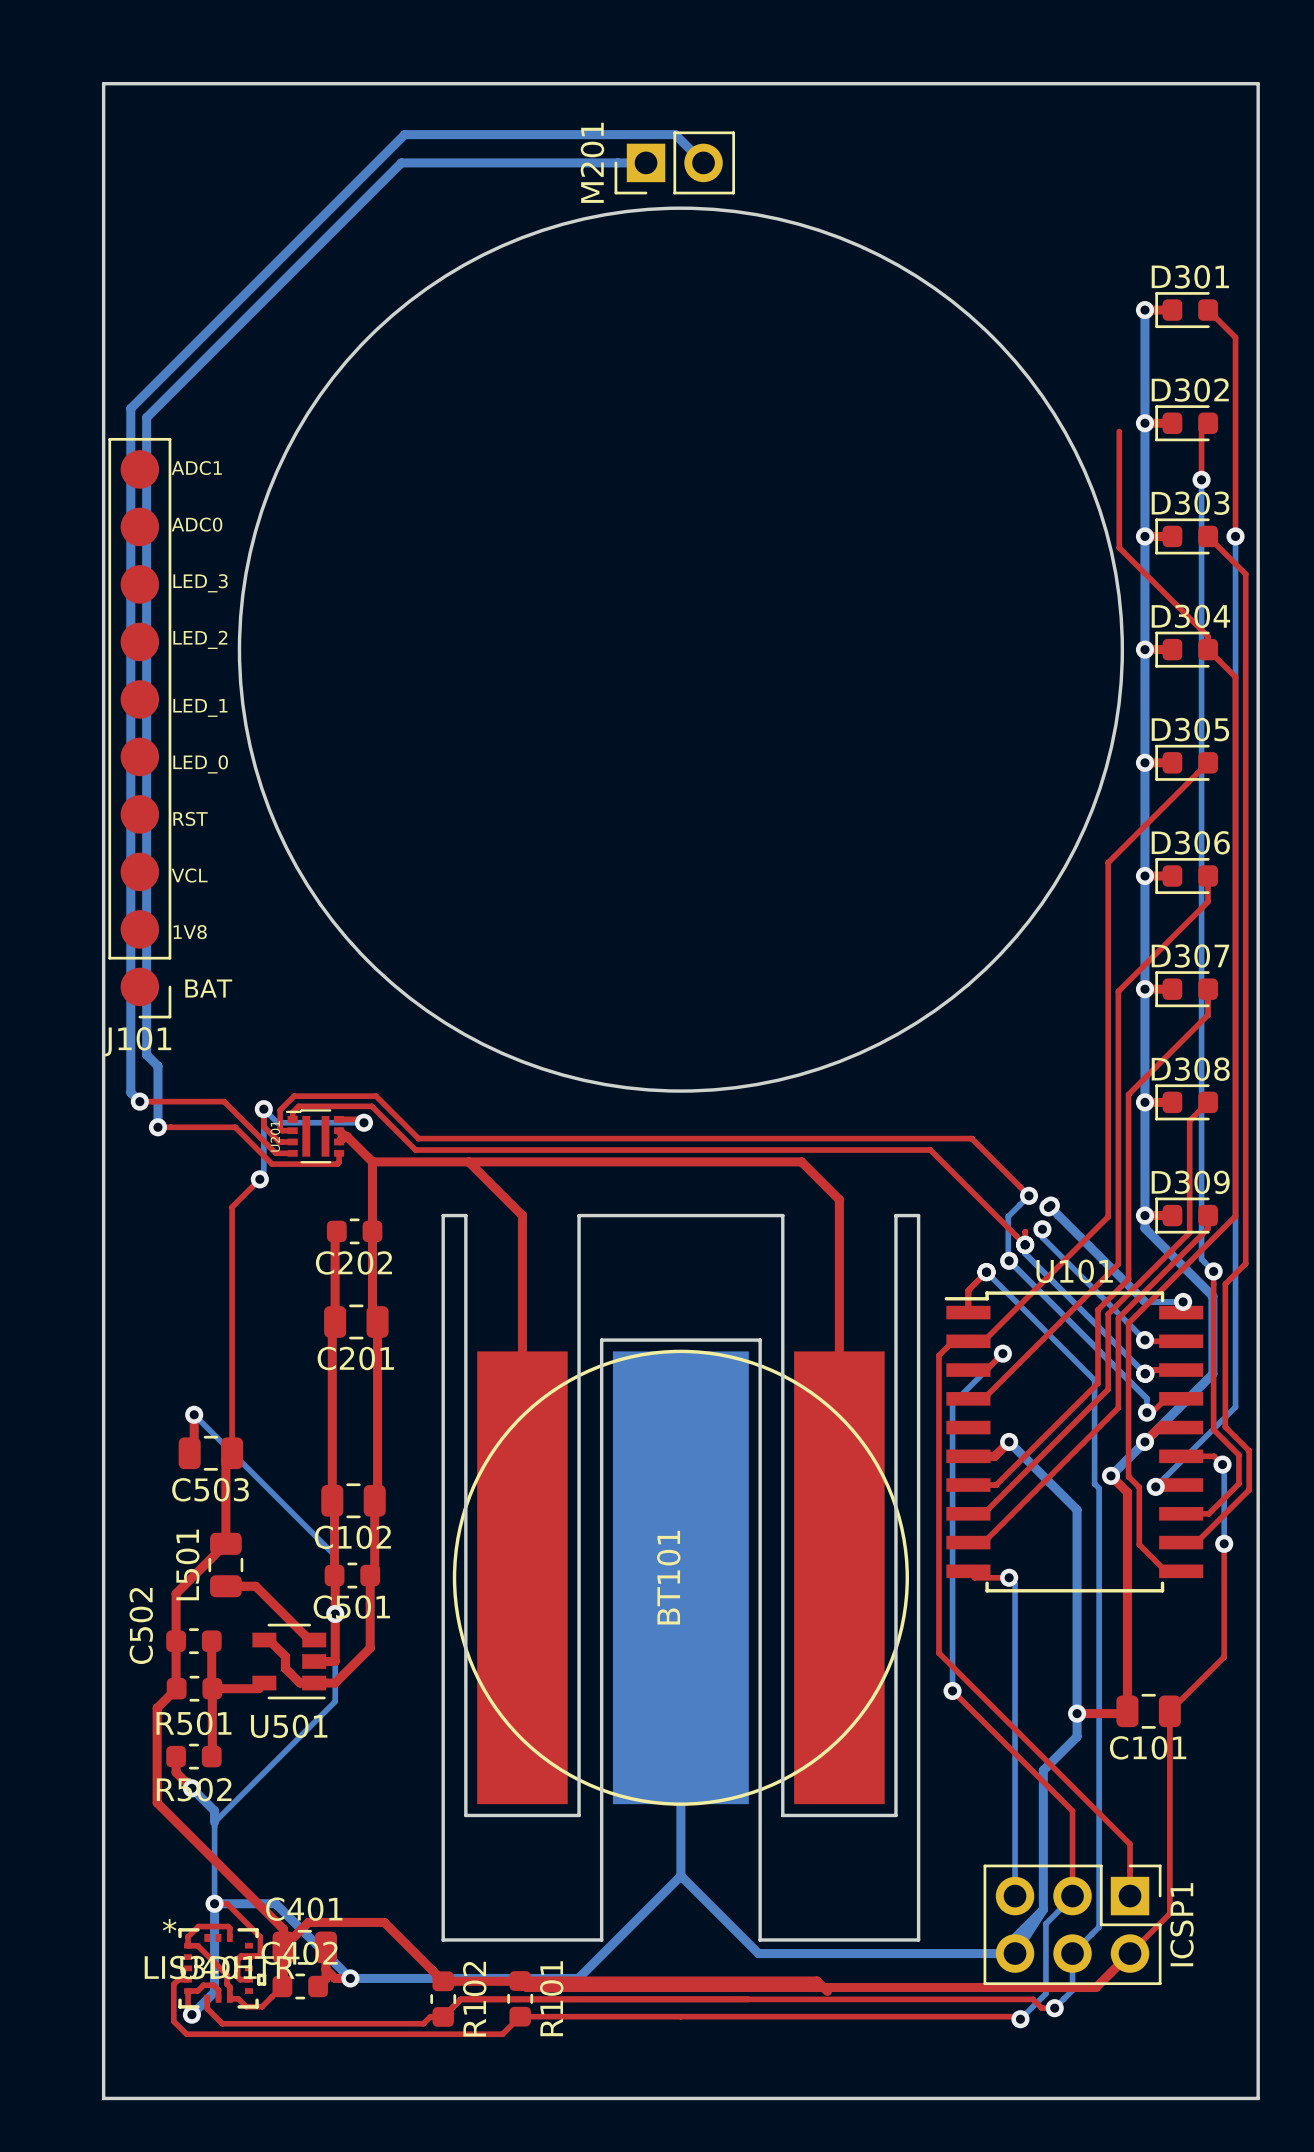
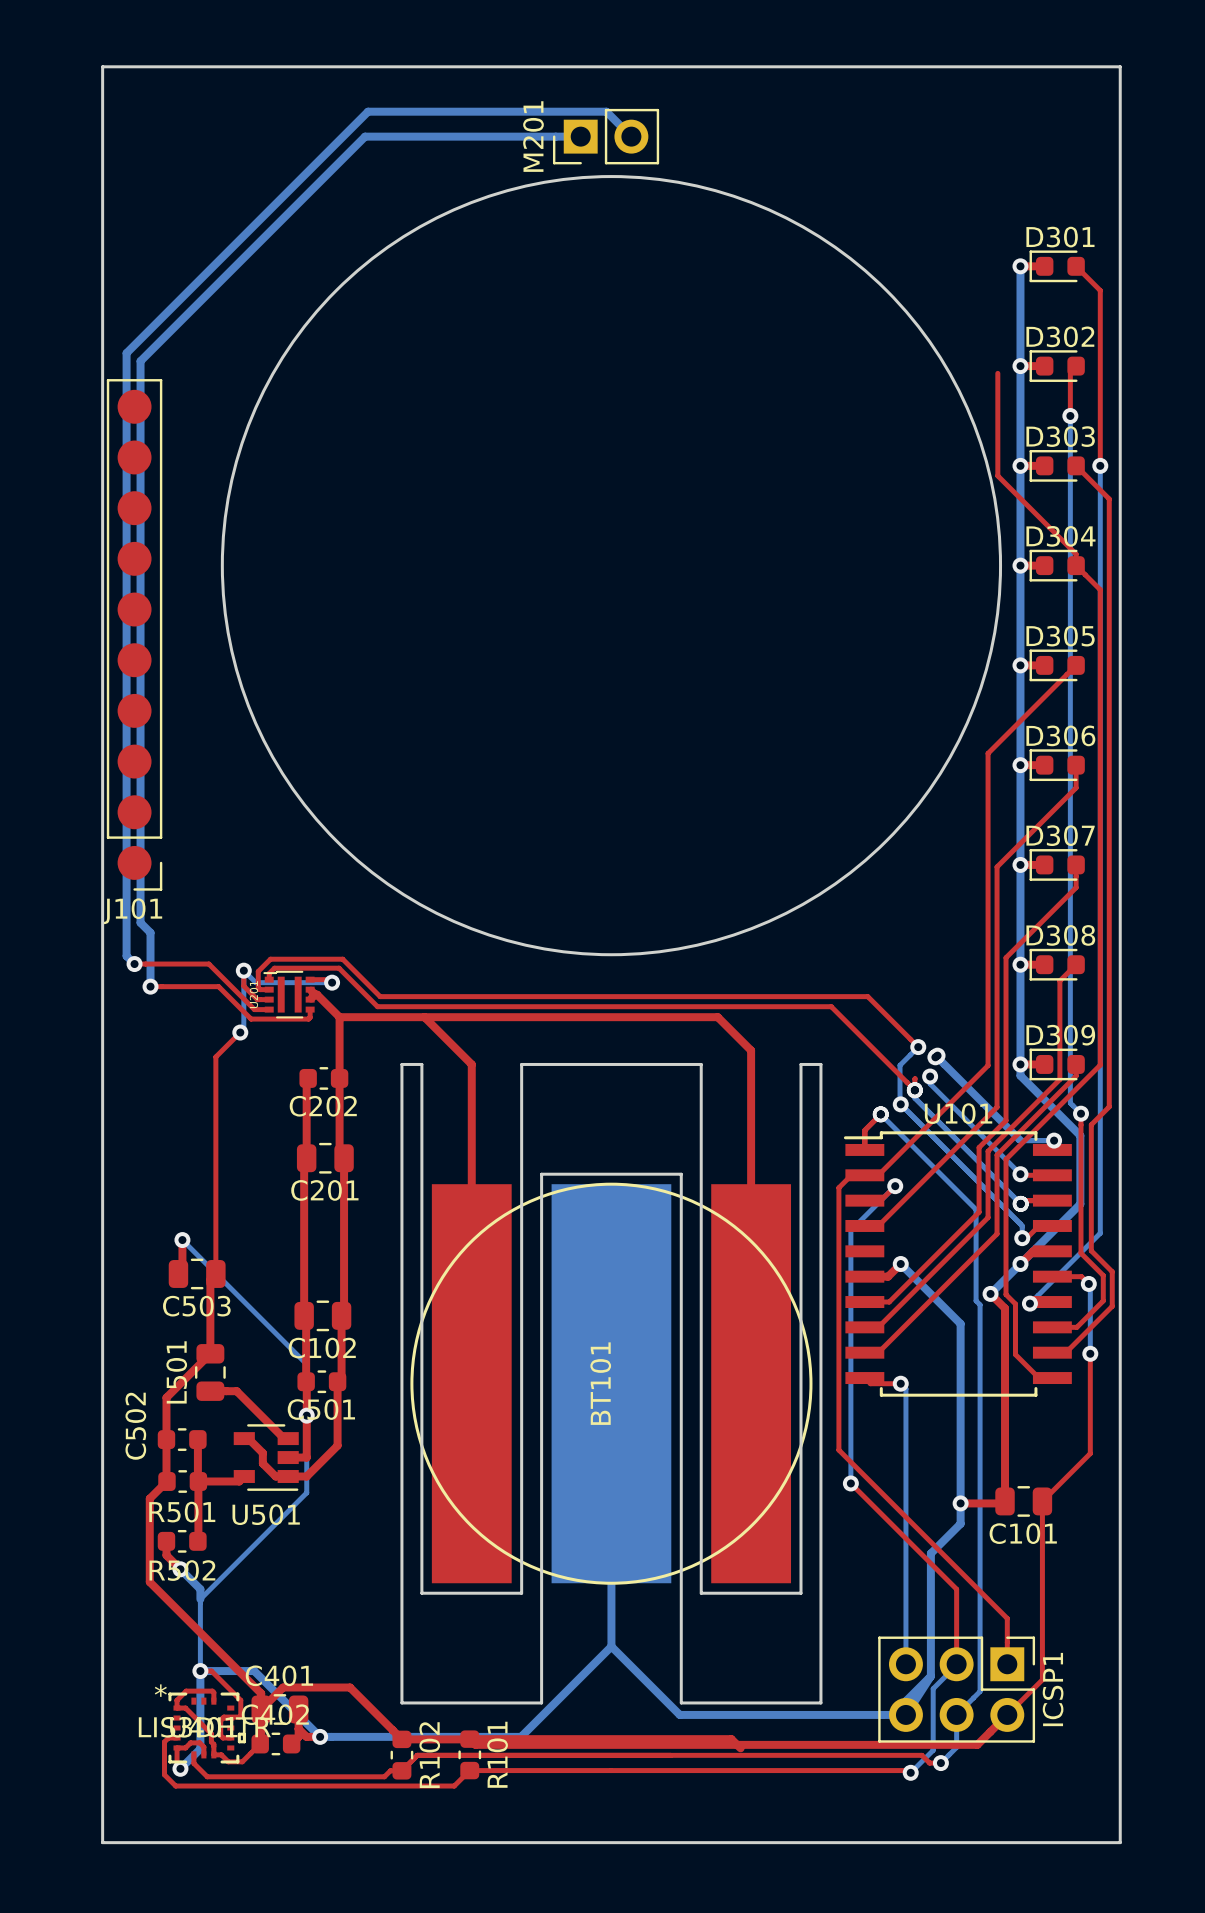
text: ADC1 (196, 468) -> none
text: ADC0 (196, 524) -> none
text: LED_3 (200, 583) -> none
text: LED_2 (200, 639) -> none
text: LED_1 (200, 707) -> none
text: LED_0 (200, 764) -> none
text: RST (190, 818) -> none
text: VCL (189, 875) -> none
text: 1V8 (190, 932) -> none
text: BAT (208, 988) -> none

